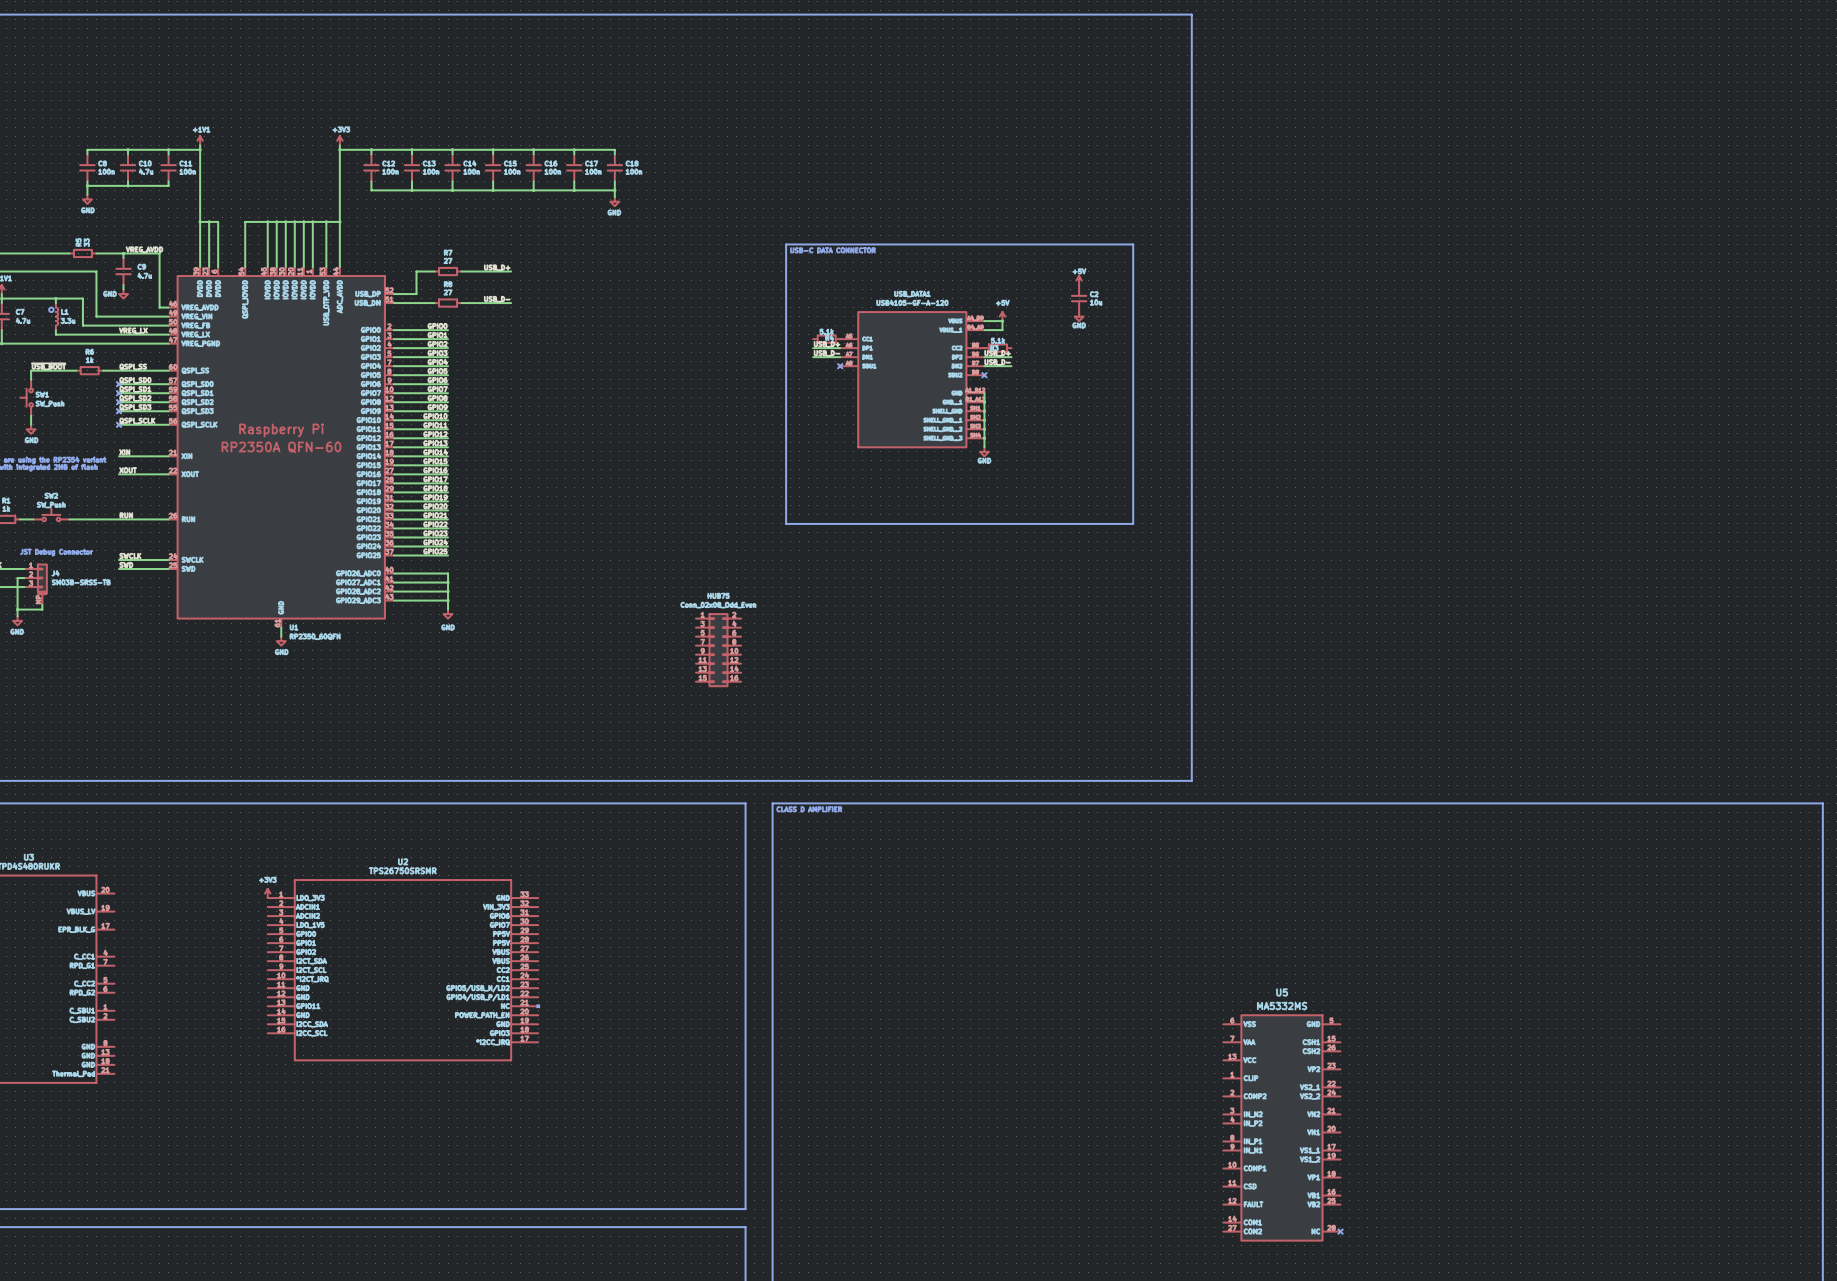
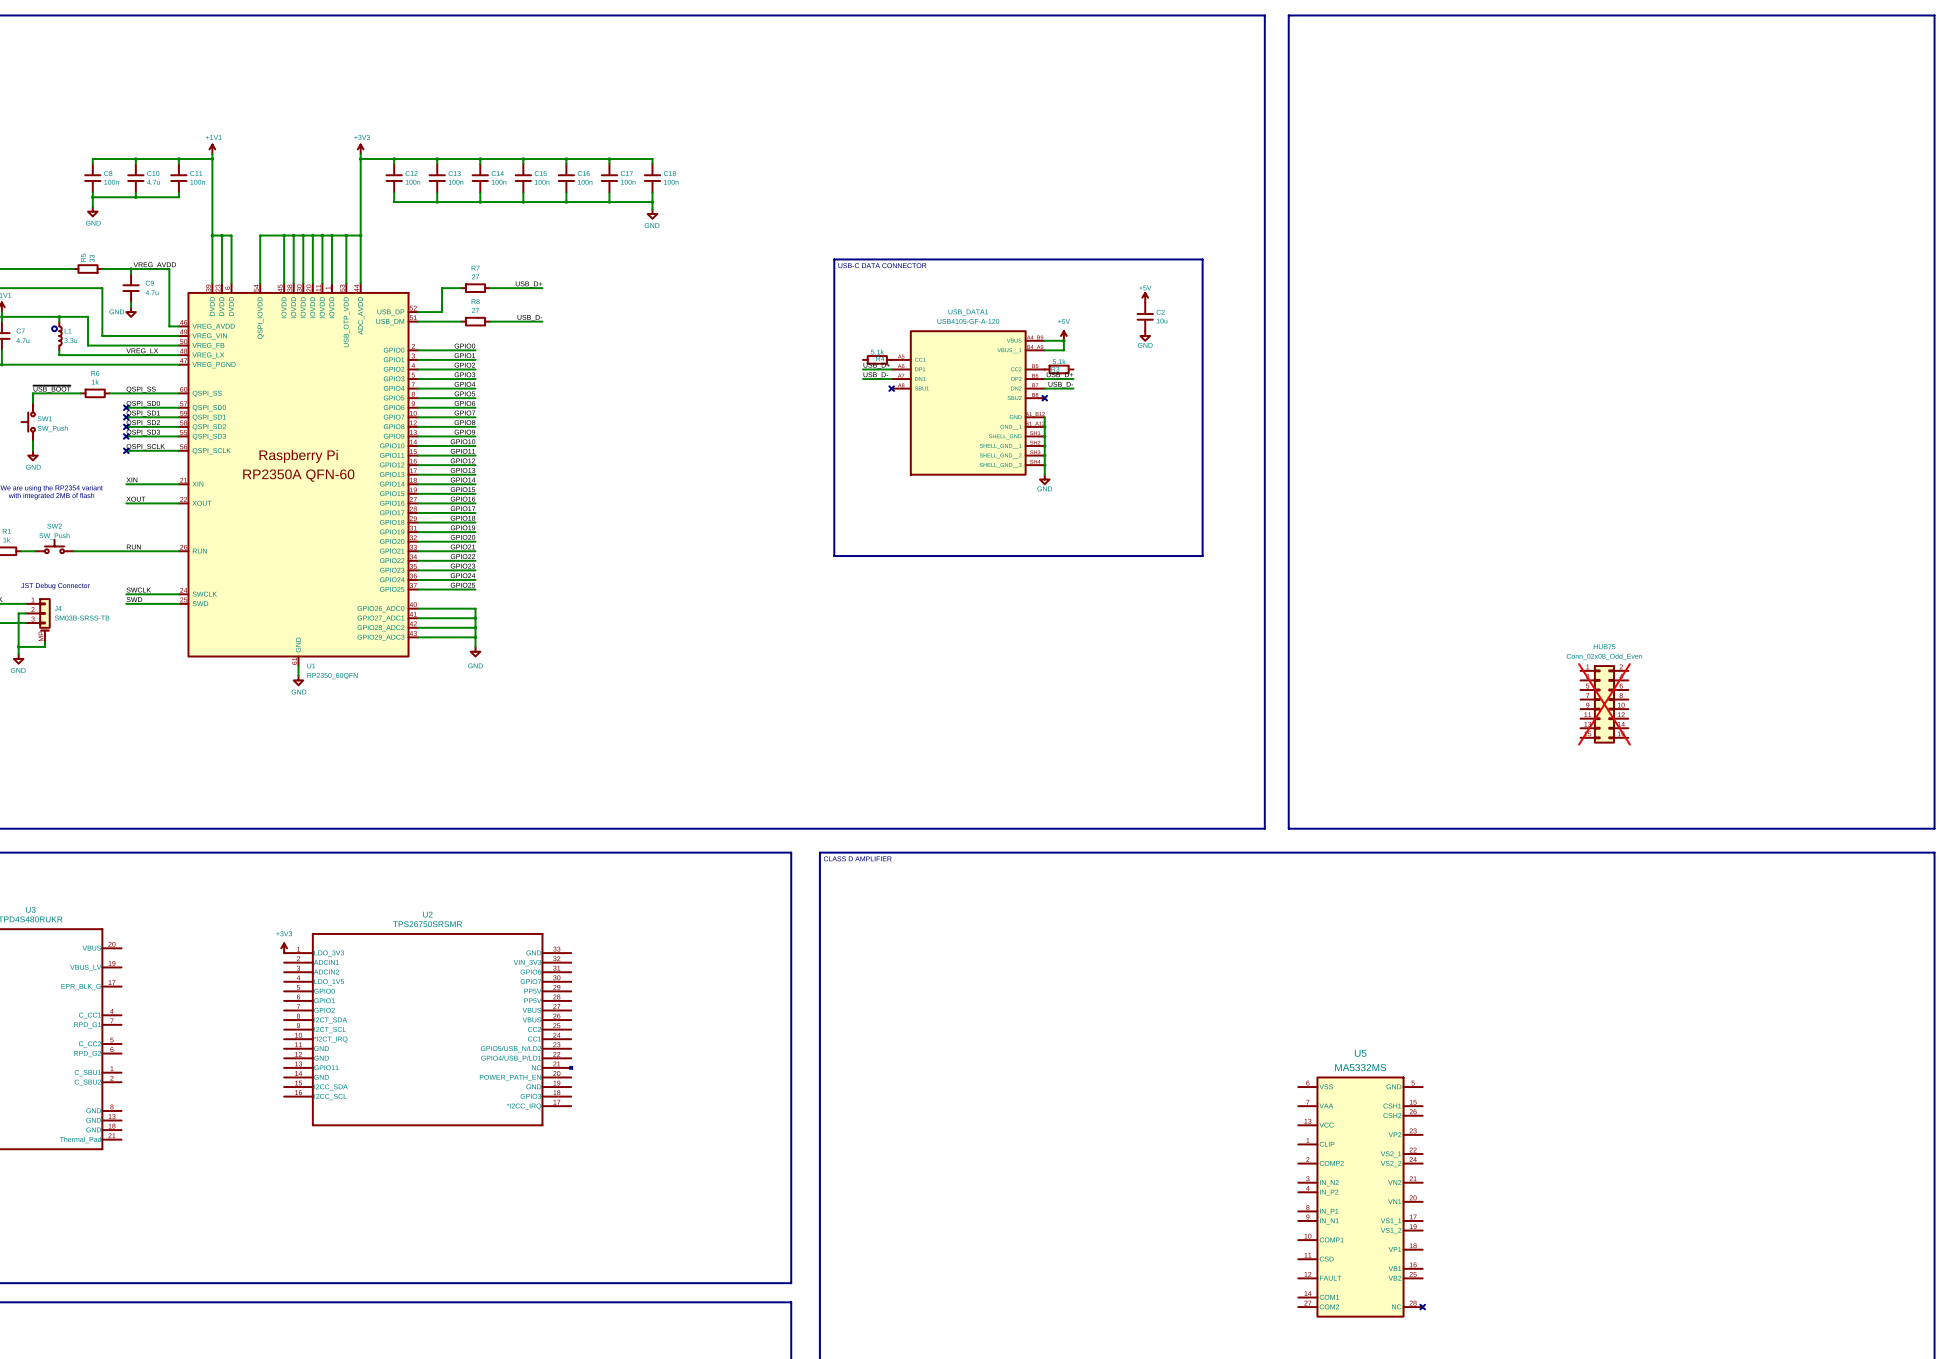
line: none -> (1288, 15) (1934, 15) (1934, 828) (1288, 828) (1288, 15)
part position: (718, 650) -> (1604, 704)
part do-not-place cross: none -> (1604, 704)

